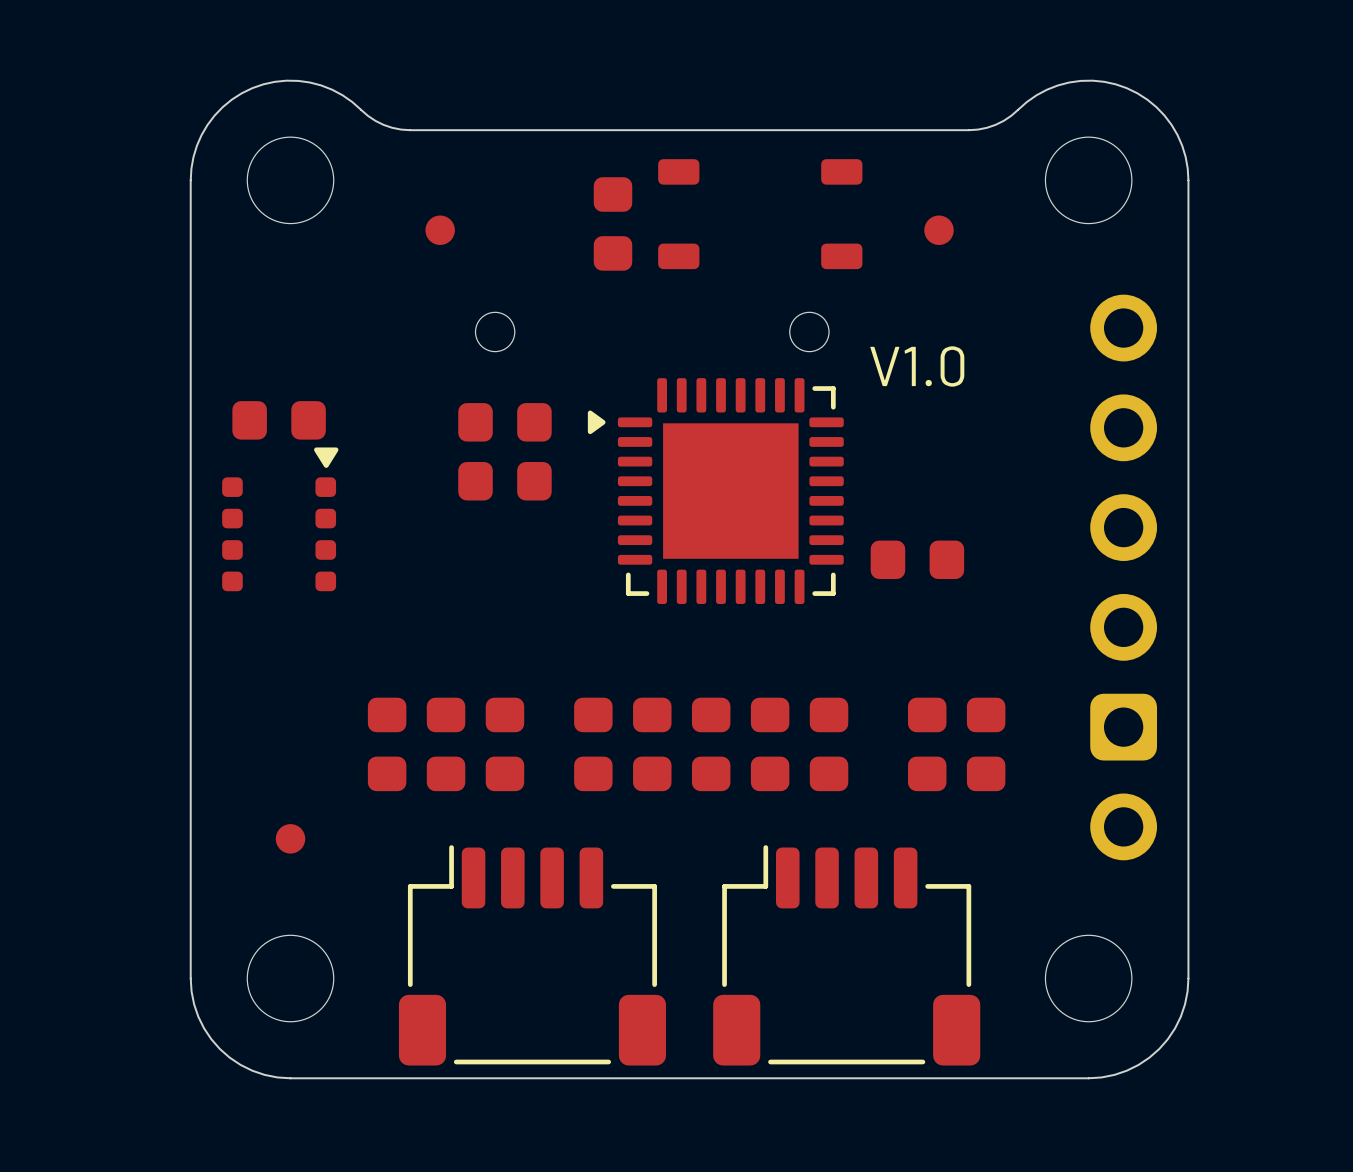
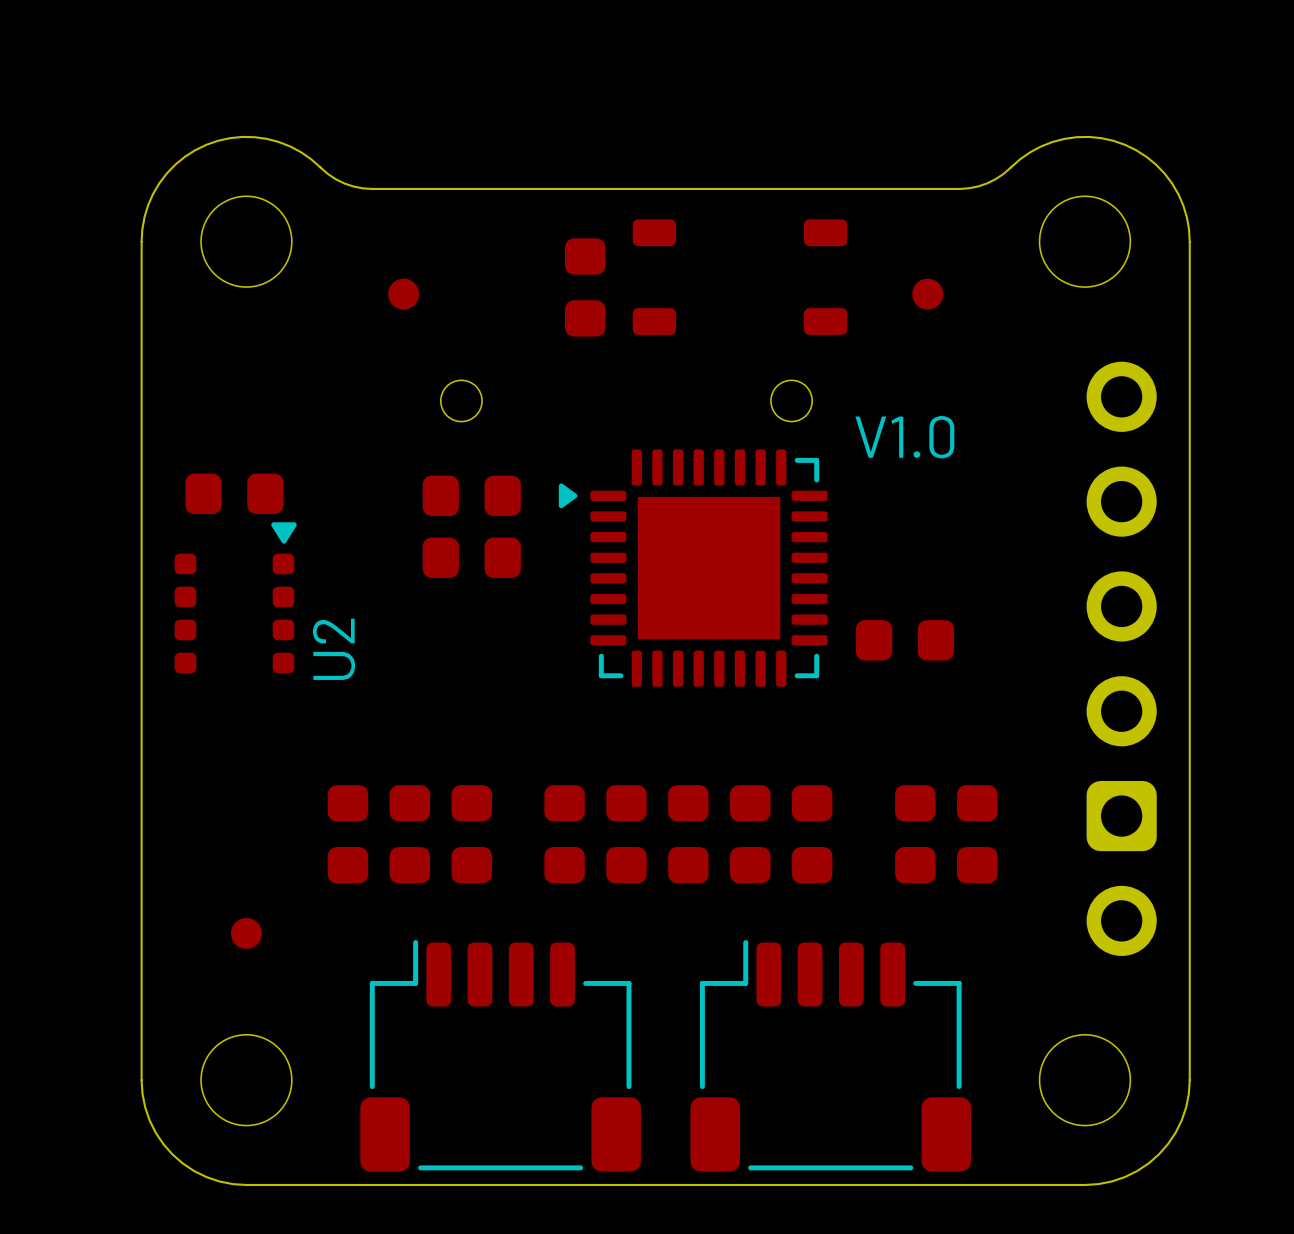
U2 name: none -> U2 (334, 649)

